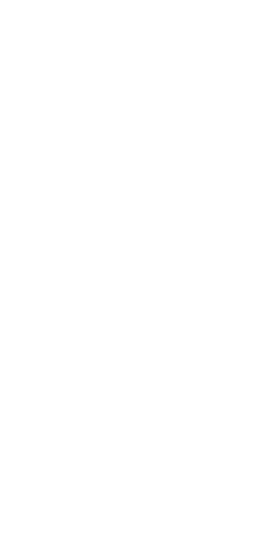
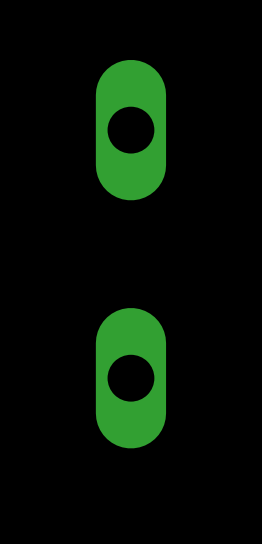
part: none -> (130, 130)
part: none -> (130, 378)

